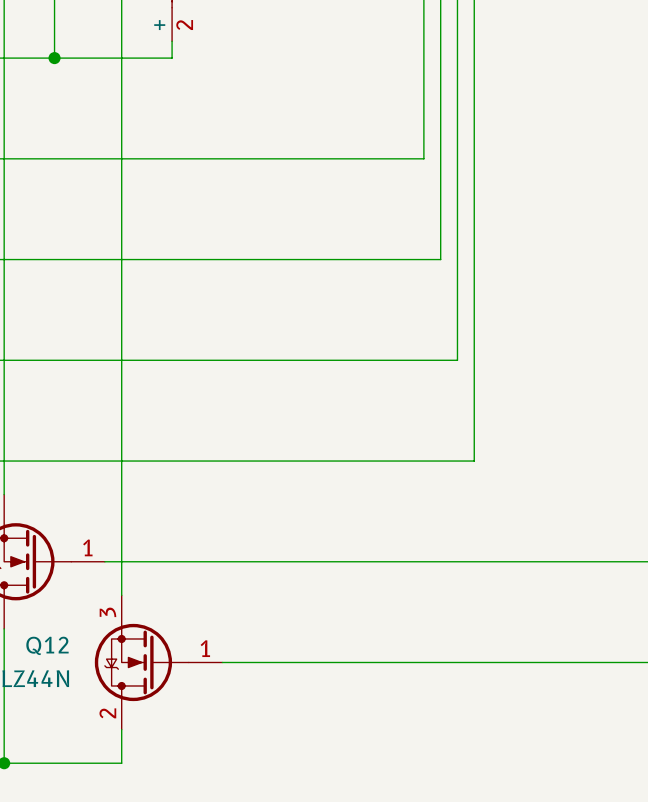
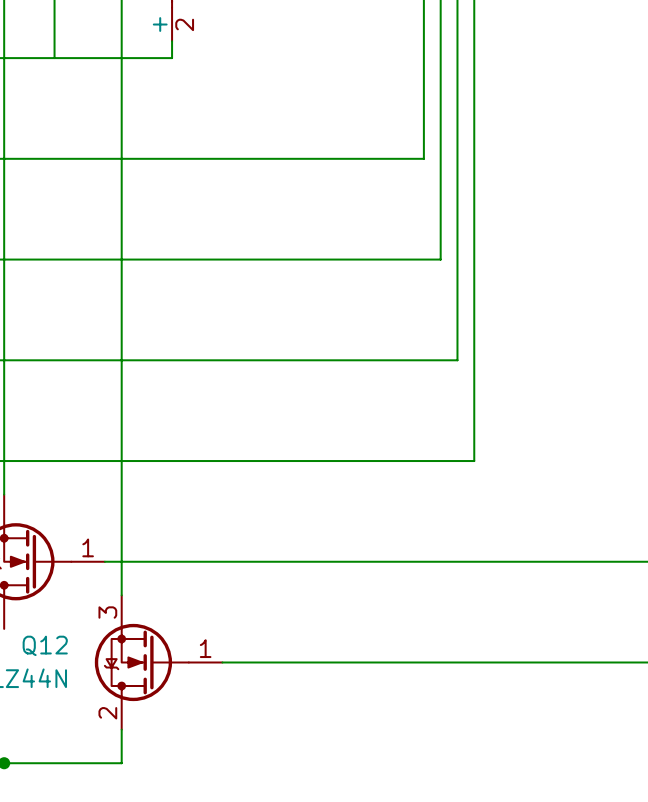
junction: (54, 58) -> none
wire: (4, 628) (4, 763) -> none

